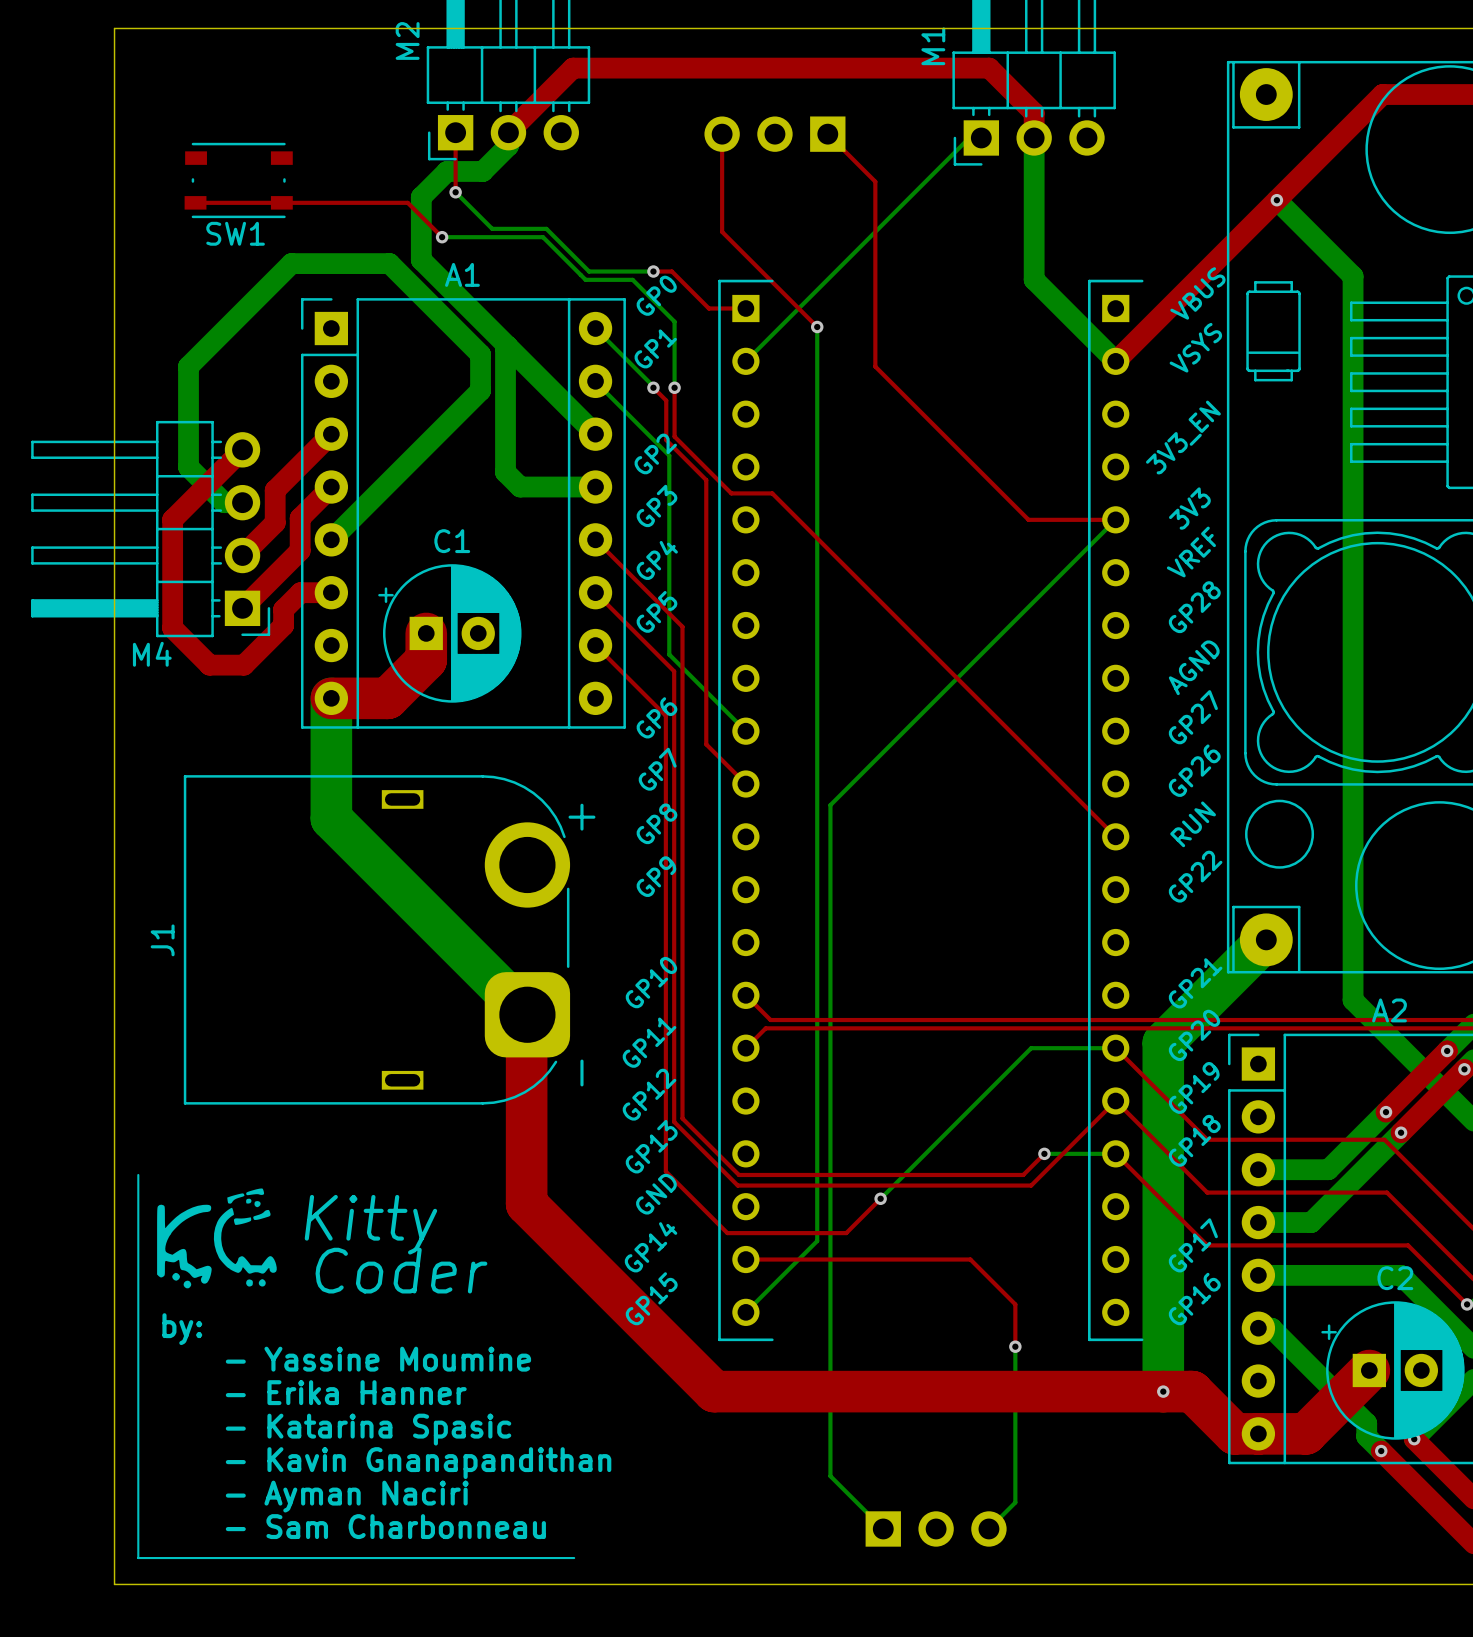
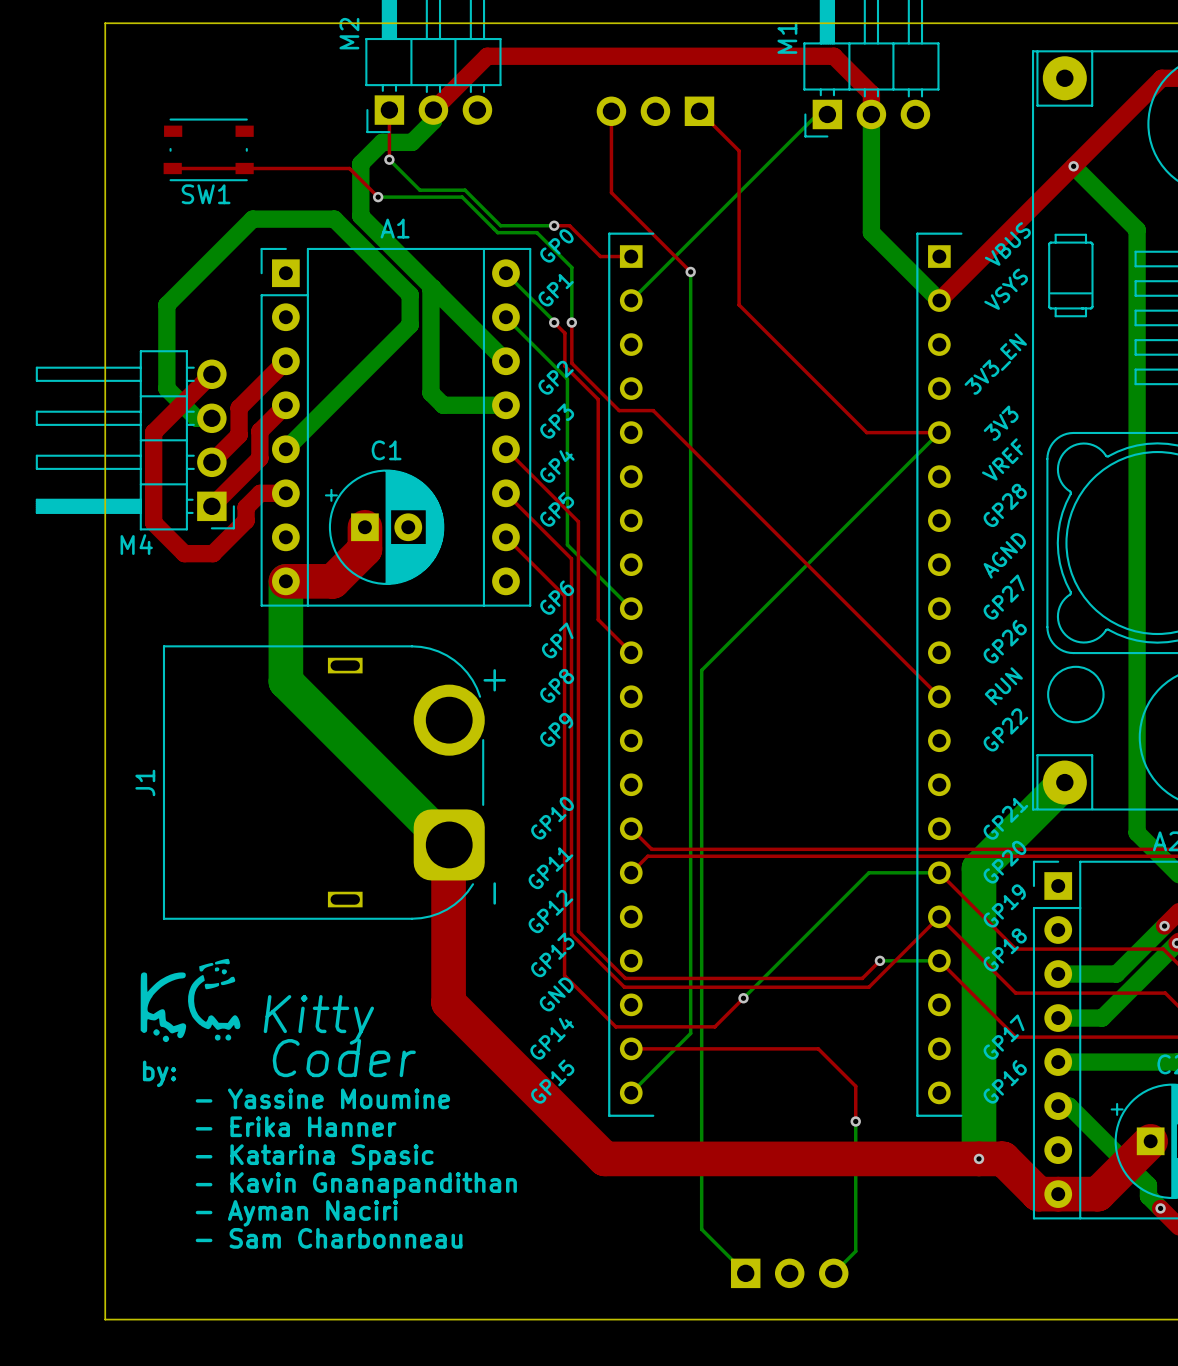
line: (138, 1174) (138, 1558) (574, 1558) -> none
drawing position: (216, 1238) -> (190, 1000)
text position: by: (182, 1329) -> by: (159, 1073)
text position: - Yassine Moumine (378, 1359) -> - Yassine Moumine (322, 1098)
text position: - Erika Hanner (346, 1392) -> - Erika Hanner (296, 1126)
text position: - Katarina Spasic (368, 1429) -> - Katarina Spasic (314, 1157)
text position: - Kavin Gnanapandithan (418, 1463) -> - Kavin Gnanapandithan (356, 1185)
text position: - Ayman Naciri (347, 1496) -> - Ayman Naciri (296, 1213)
text position: - Sam Charbonneau (385, 1526) -> - Sam Charbonneau (329, 1238)

